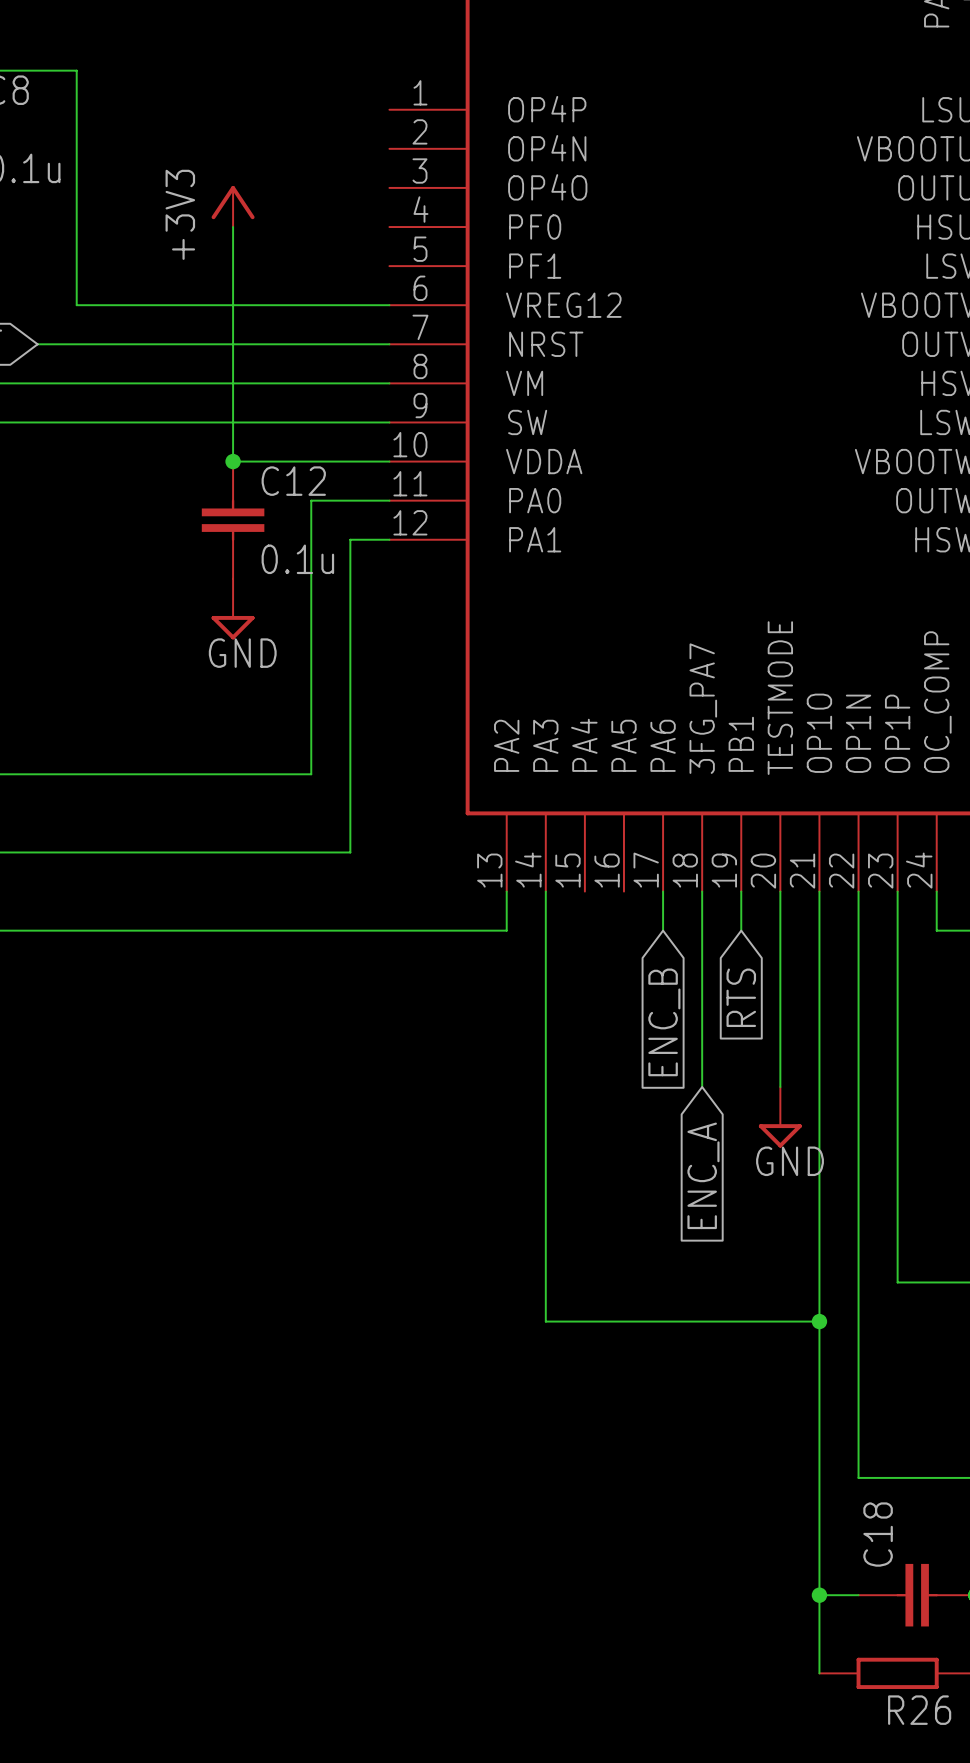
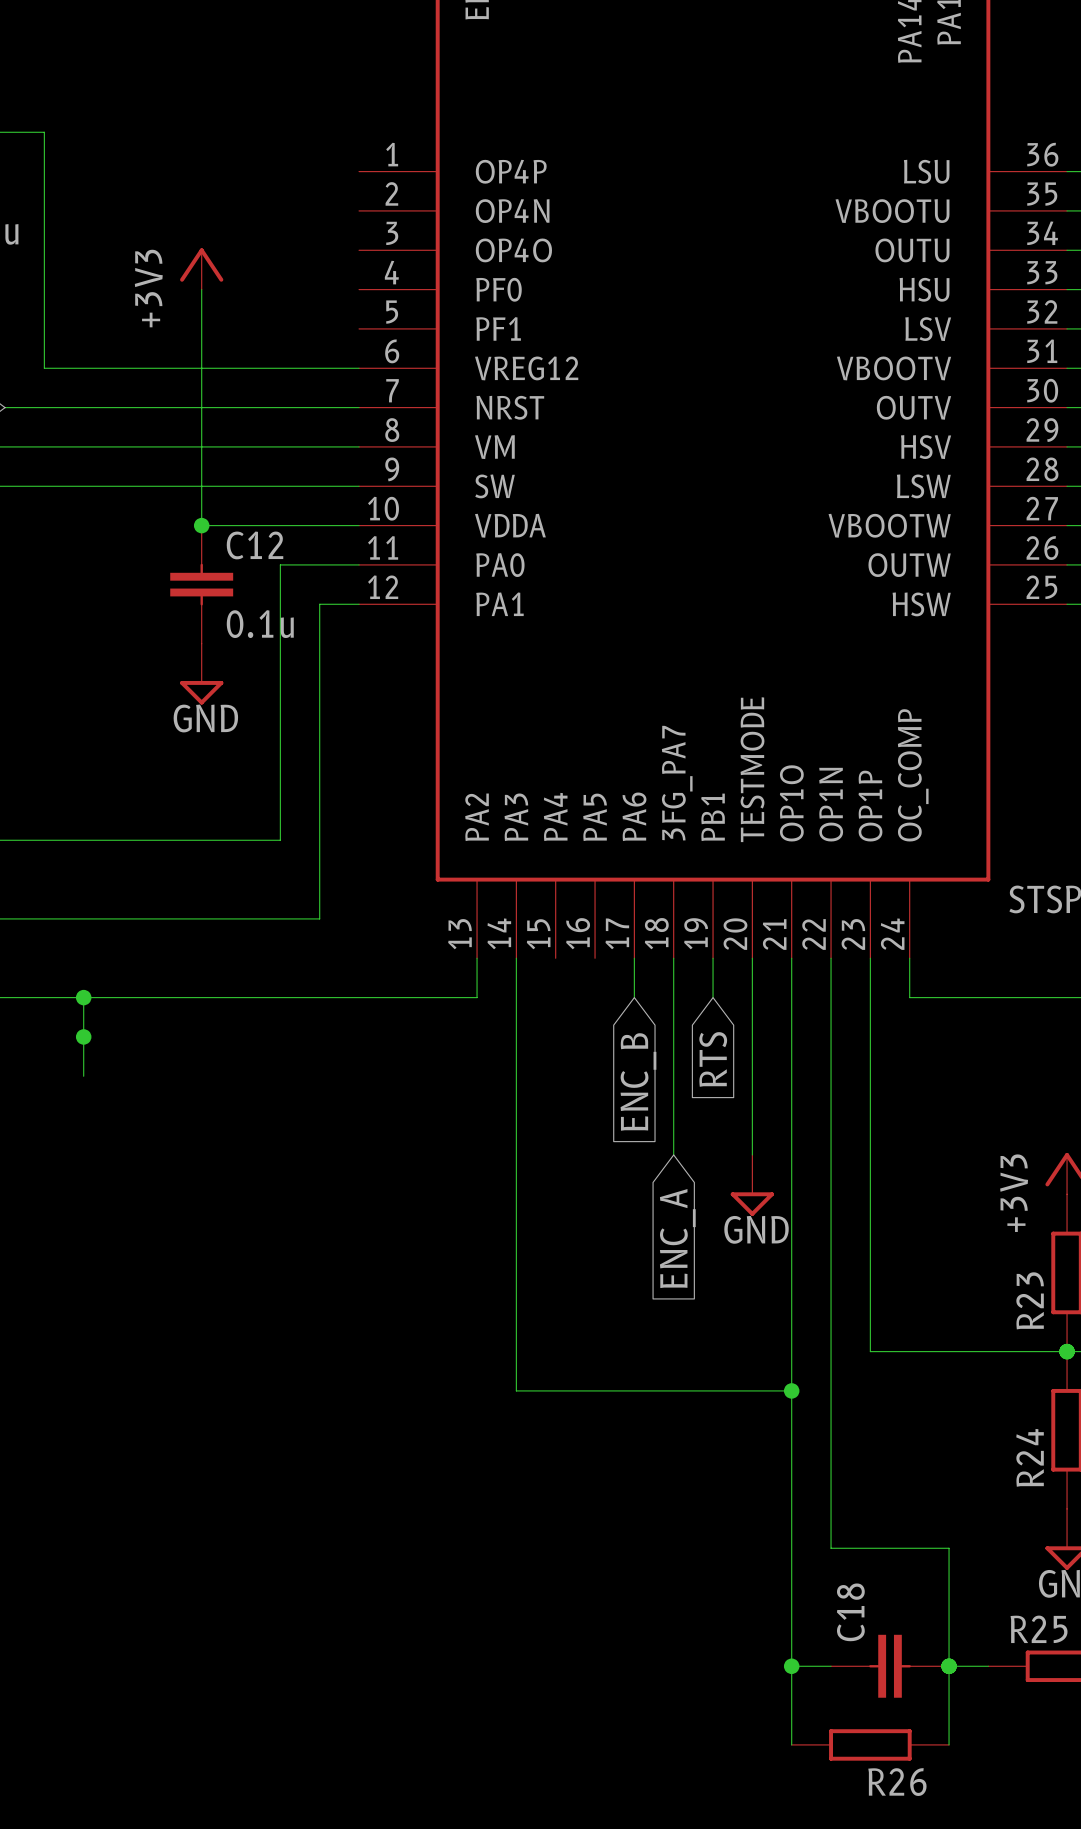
wire: none -> (83, 997) (83, 1076)
junction: none -> (83, 997)
junction: none -> (83, 1036)

